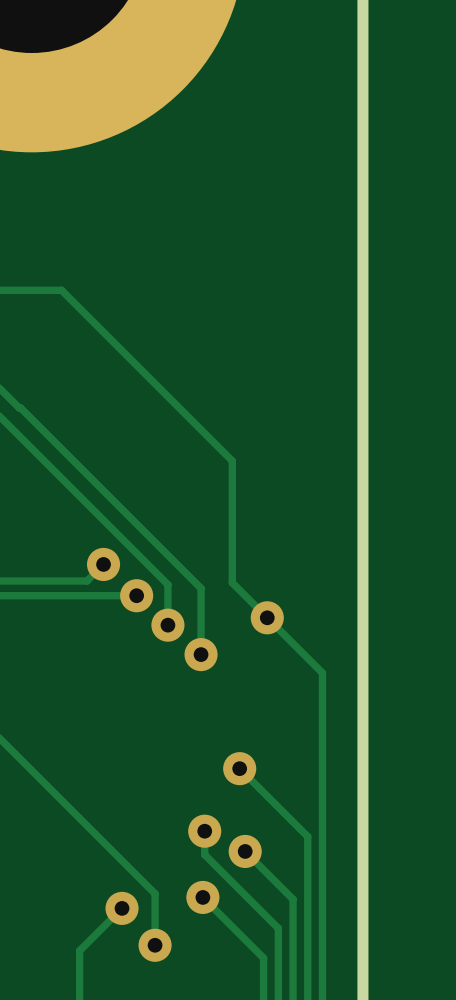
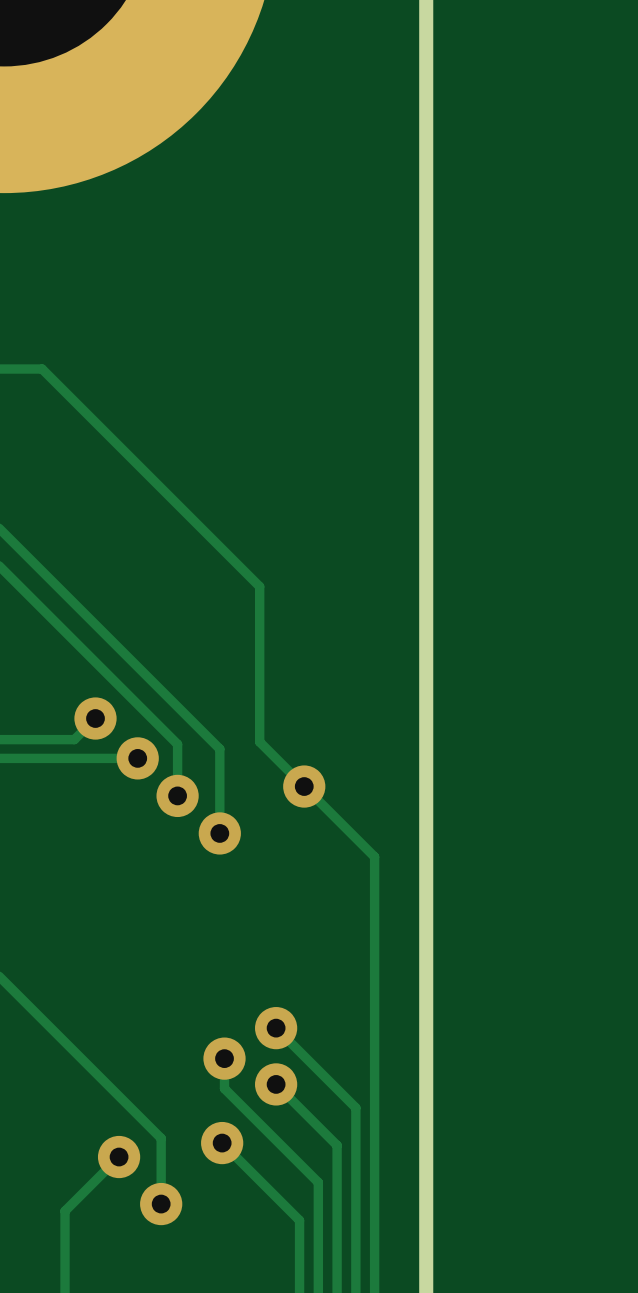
track: (239, 768) (307, 836) (307, 869) -> (276, 1028) (355, 1107)
via position: (239, 768) -> (276, 1028)

